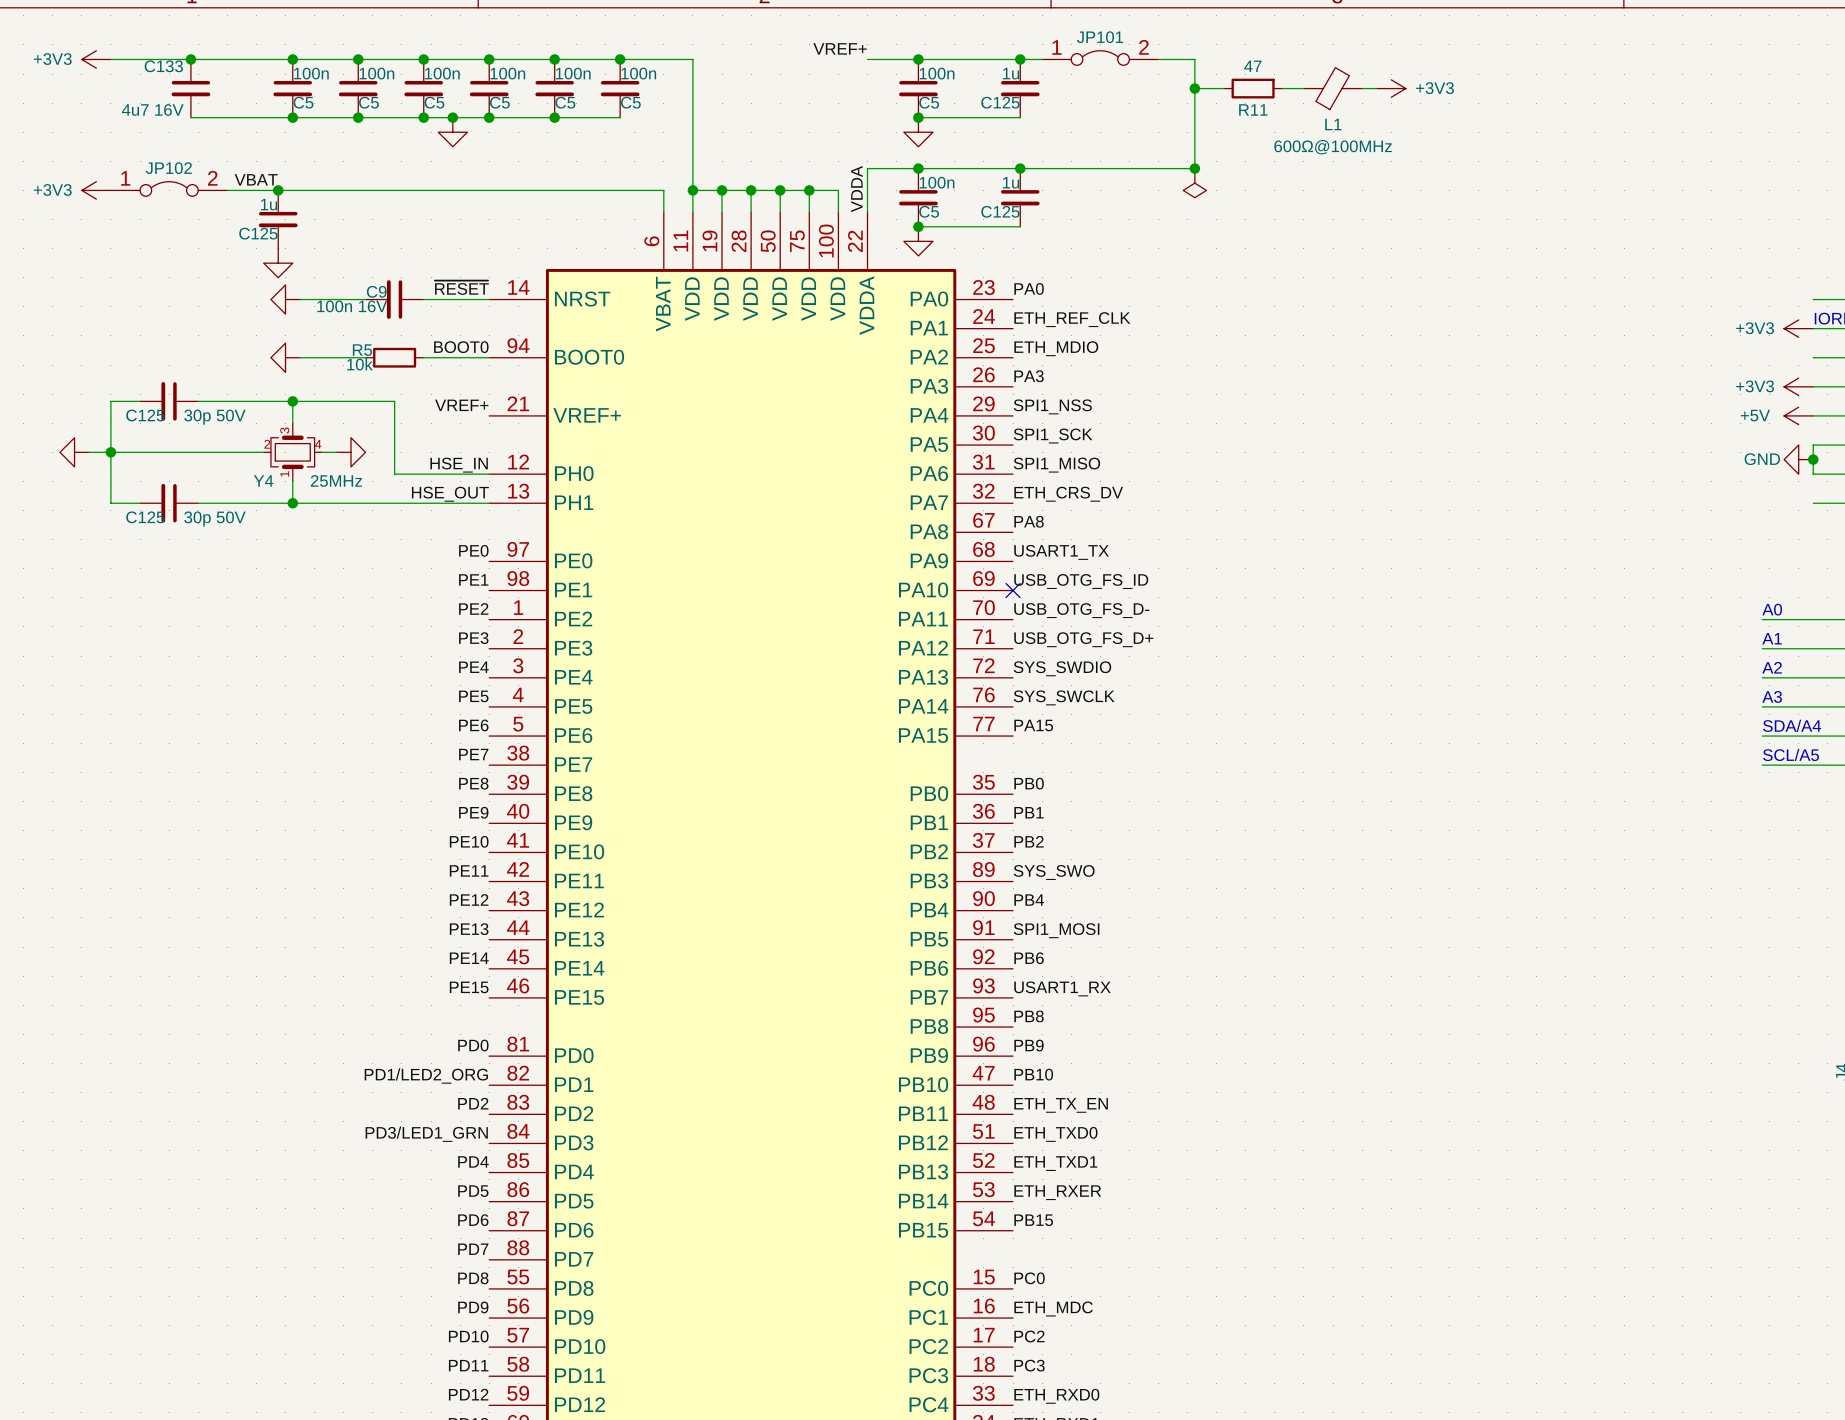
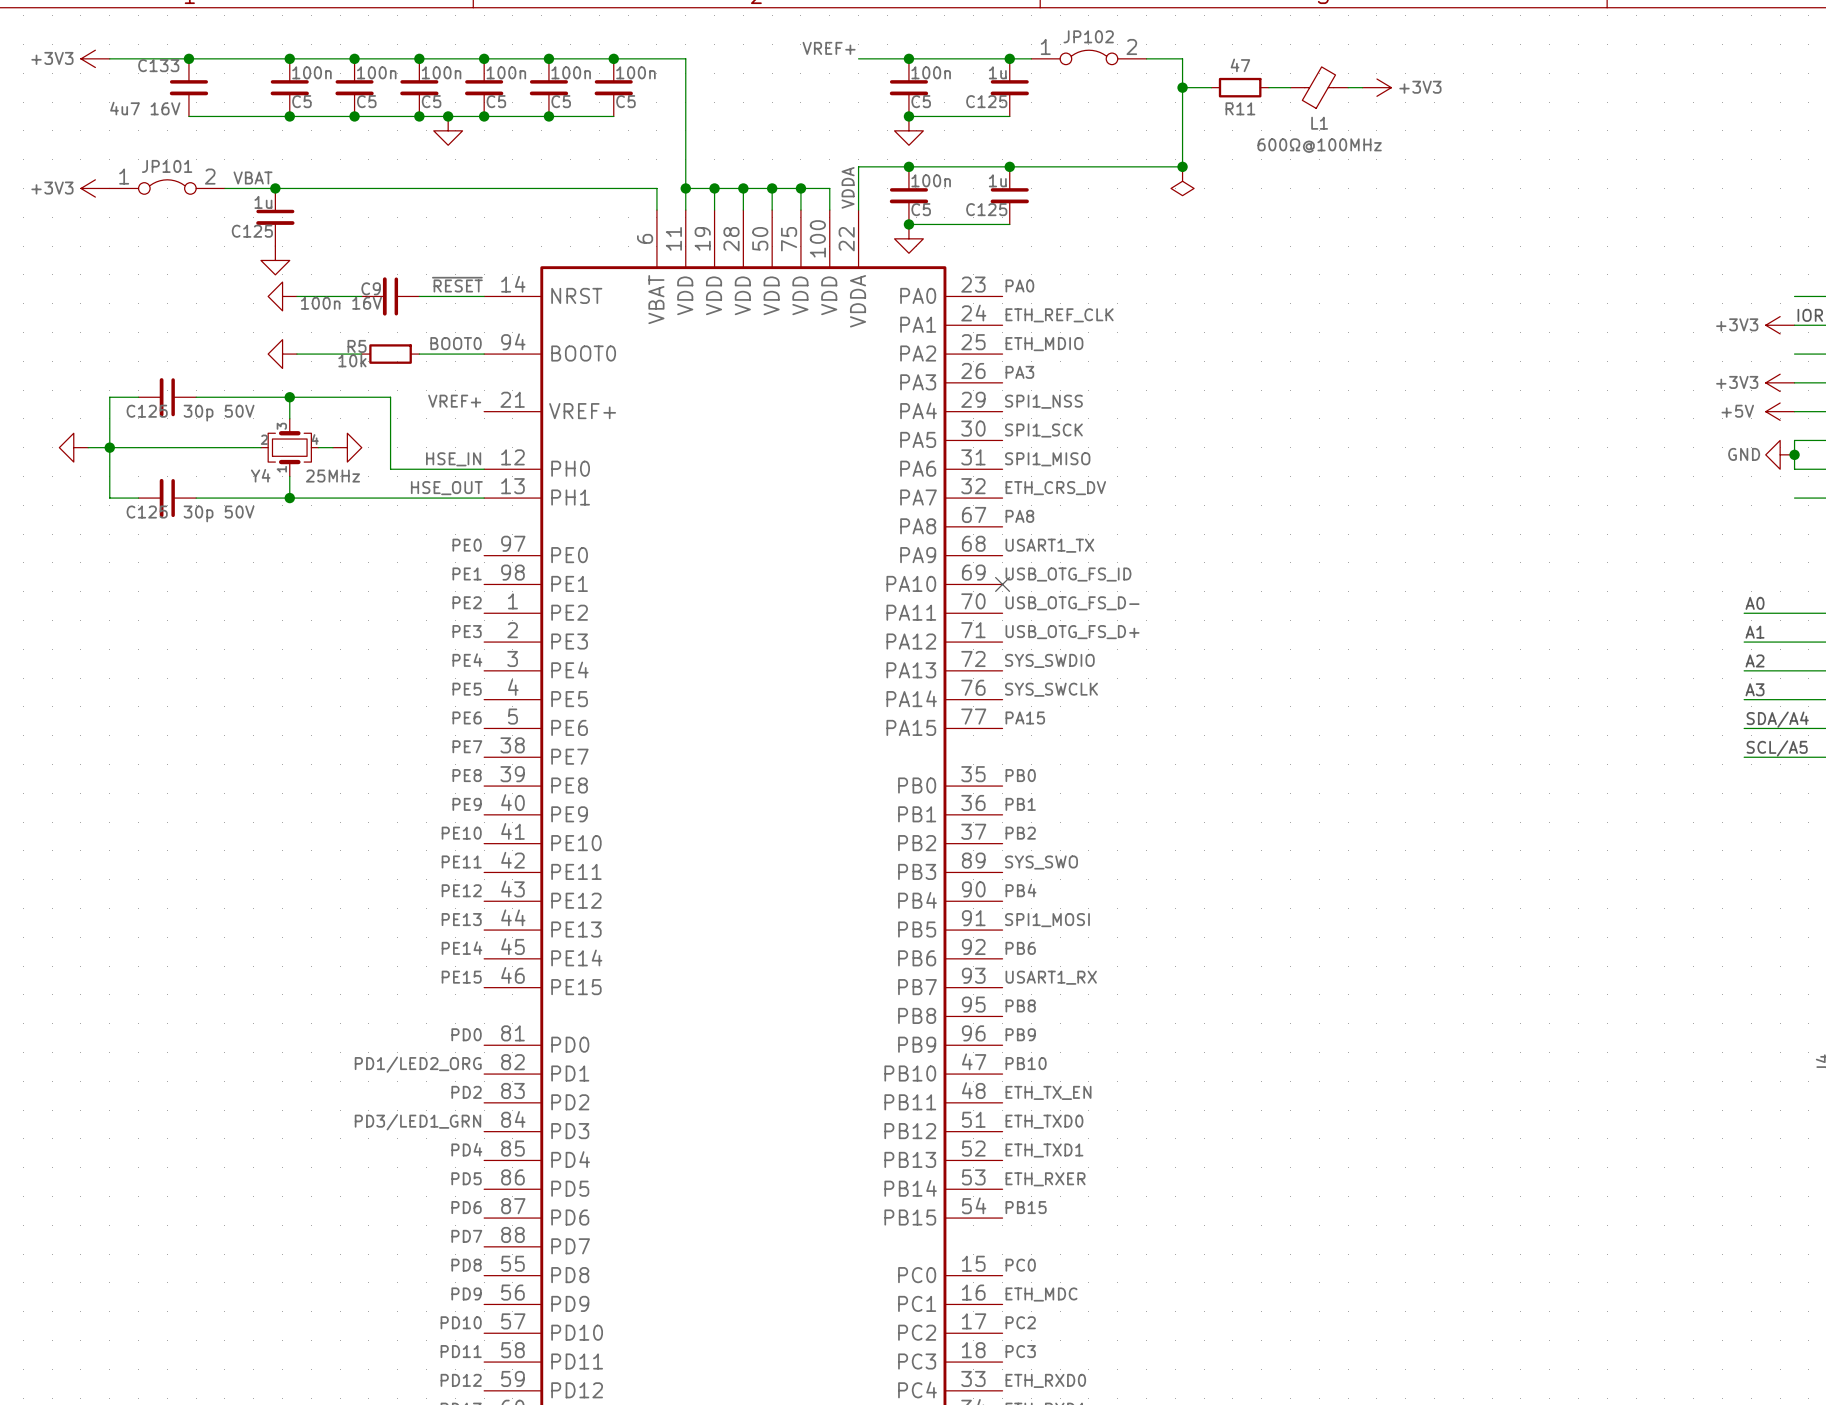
JP101 name: JP101 (1100, 37) -> JP102 (1088, 36)
JP102 name: JP102 (168, 168) -> JP101 (167, 166)

